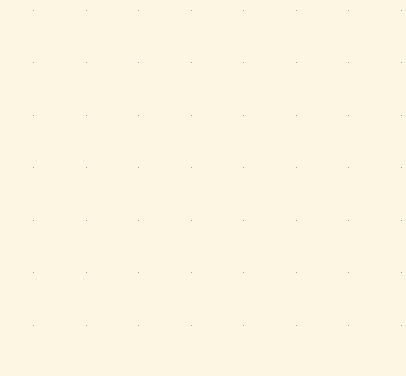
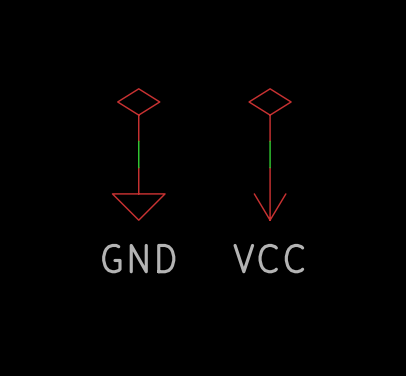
power symbol: none -> (138, 115)
power symbol: none -> (270, 115)
wire: none -> (138, 141) (138, 167)
wire: none -> (270, 141) (270, 167)
power symbol: none -> GND (138, 193)
power symbol: none -> VCC (270, 193)

